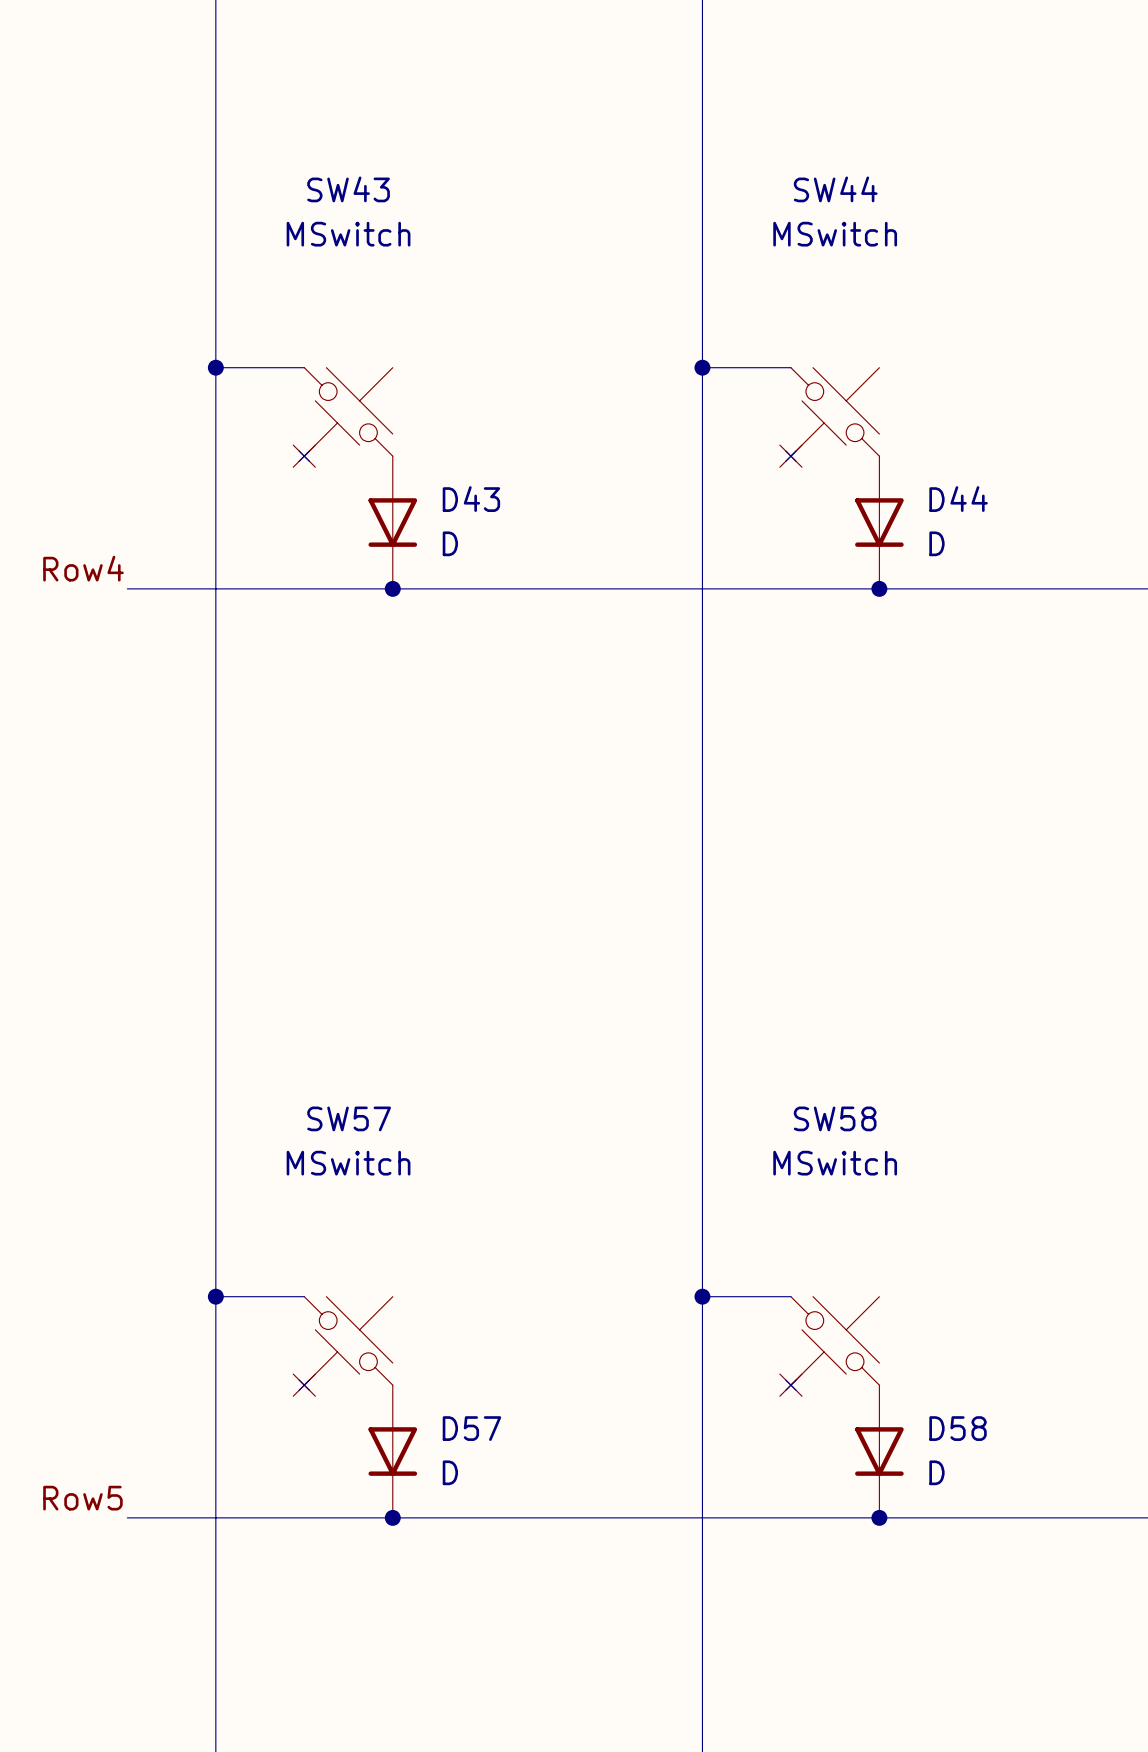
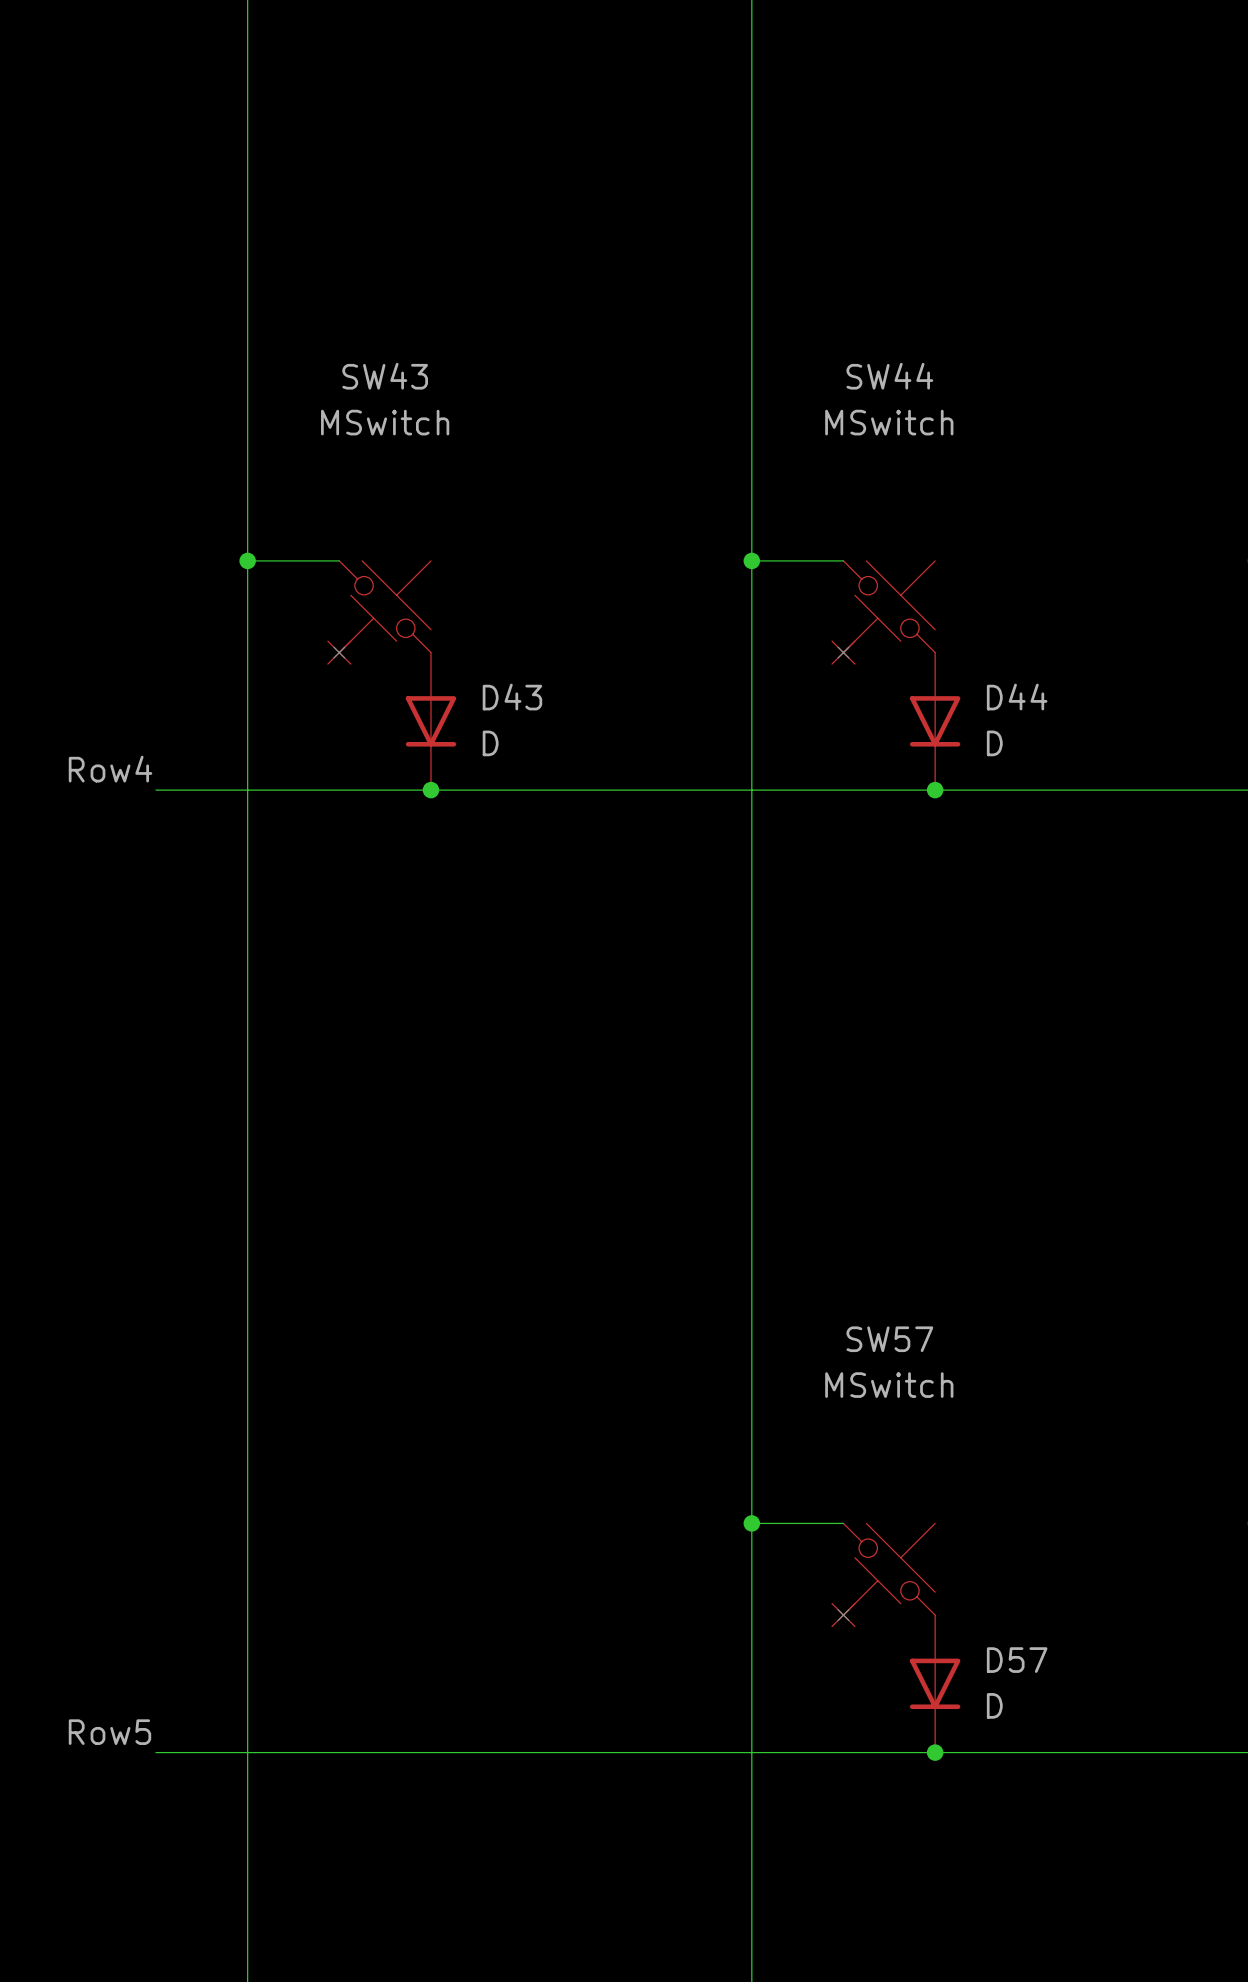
SW58 name: SW58 (835, 1118) -> SW57 (889, 1339)
wire: (215, 1296) (304, 1296) -> none
junction: (215, 1296) -> none
SW57: MSwitch (343, 1346) -> none
D58 name: D58 (958, 1428) -> D57 (1017, 1660)
D57: D (392, 1451) -> none
junction: (392, 1517) -> none

